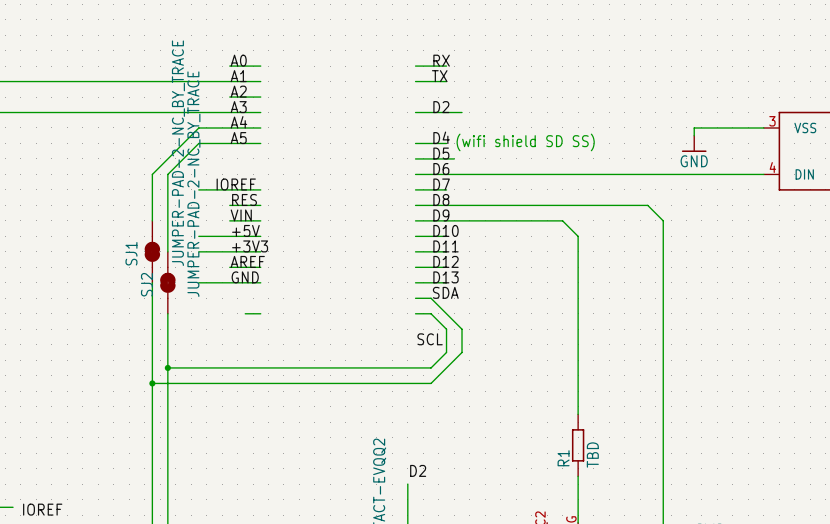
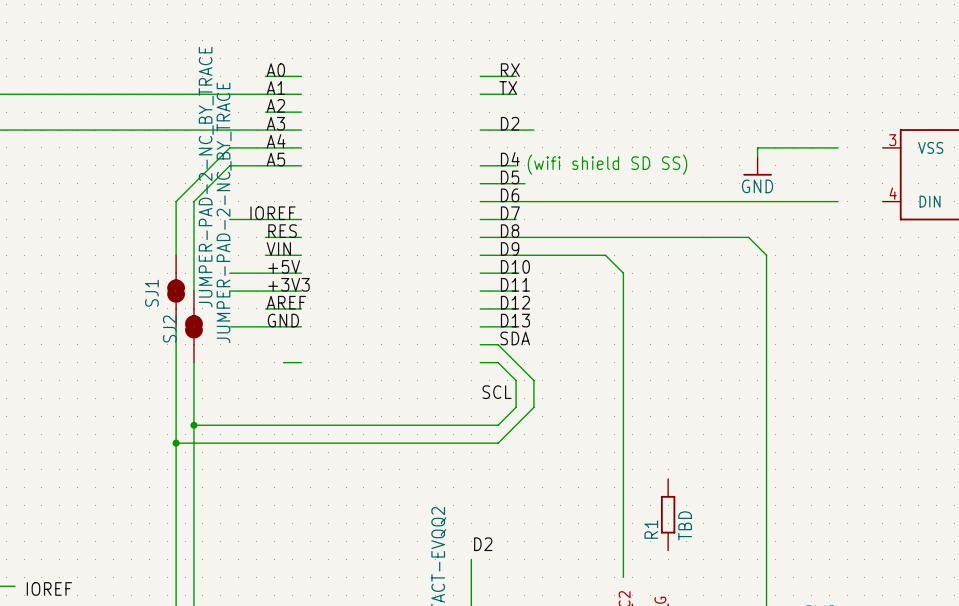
wire: (694, 127) (694, 135) -> (802, 147) (757, 147) (757, 156)
wire: (725, 127) (763, 127) -> none
power symbol position: GND (694, 143) -> GND (757, 166)
wire: (725, 174) (763, 174) -> none
wire: (523, 220) (562, 220) (578, 236) (578, 414) -> (605, 255) (623, 273) (623, 577)
wire: (578, 476) (578, 522) -> none

